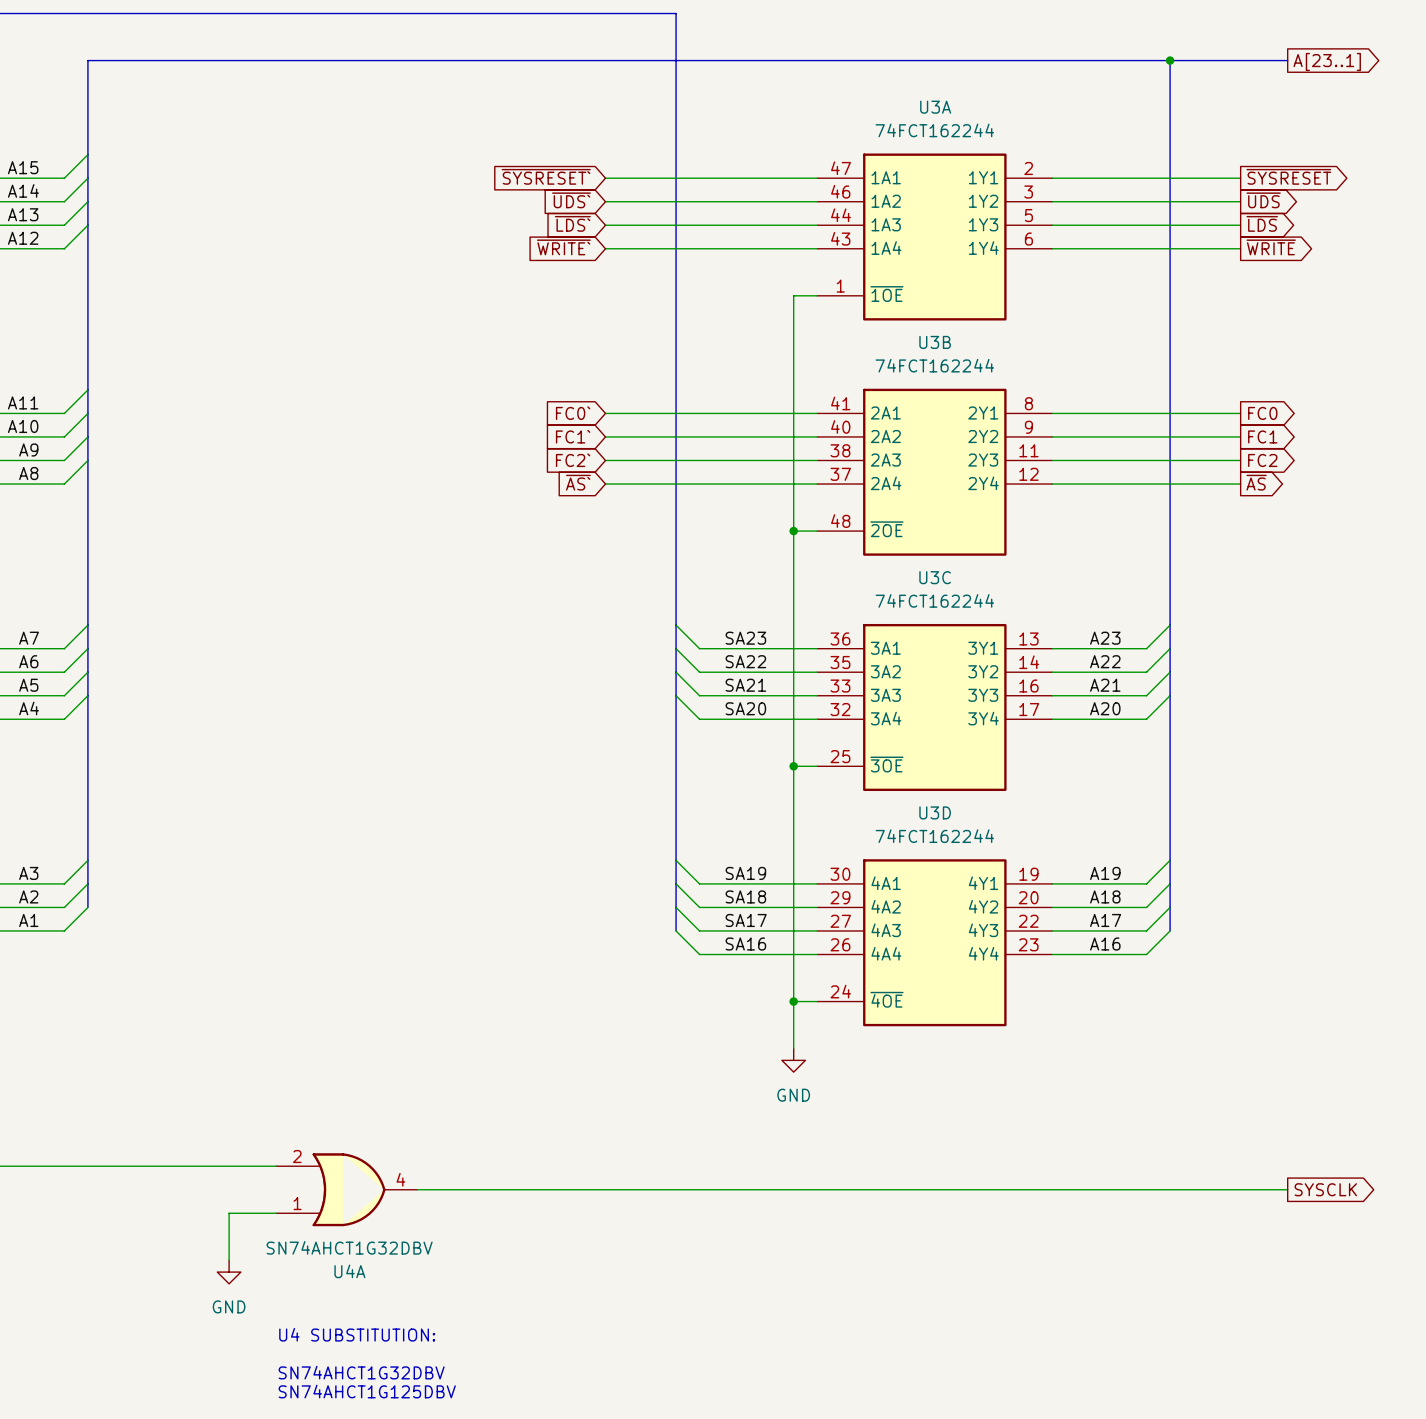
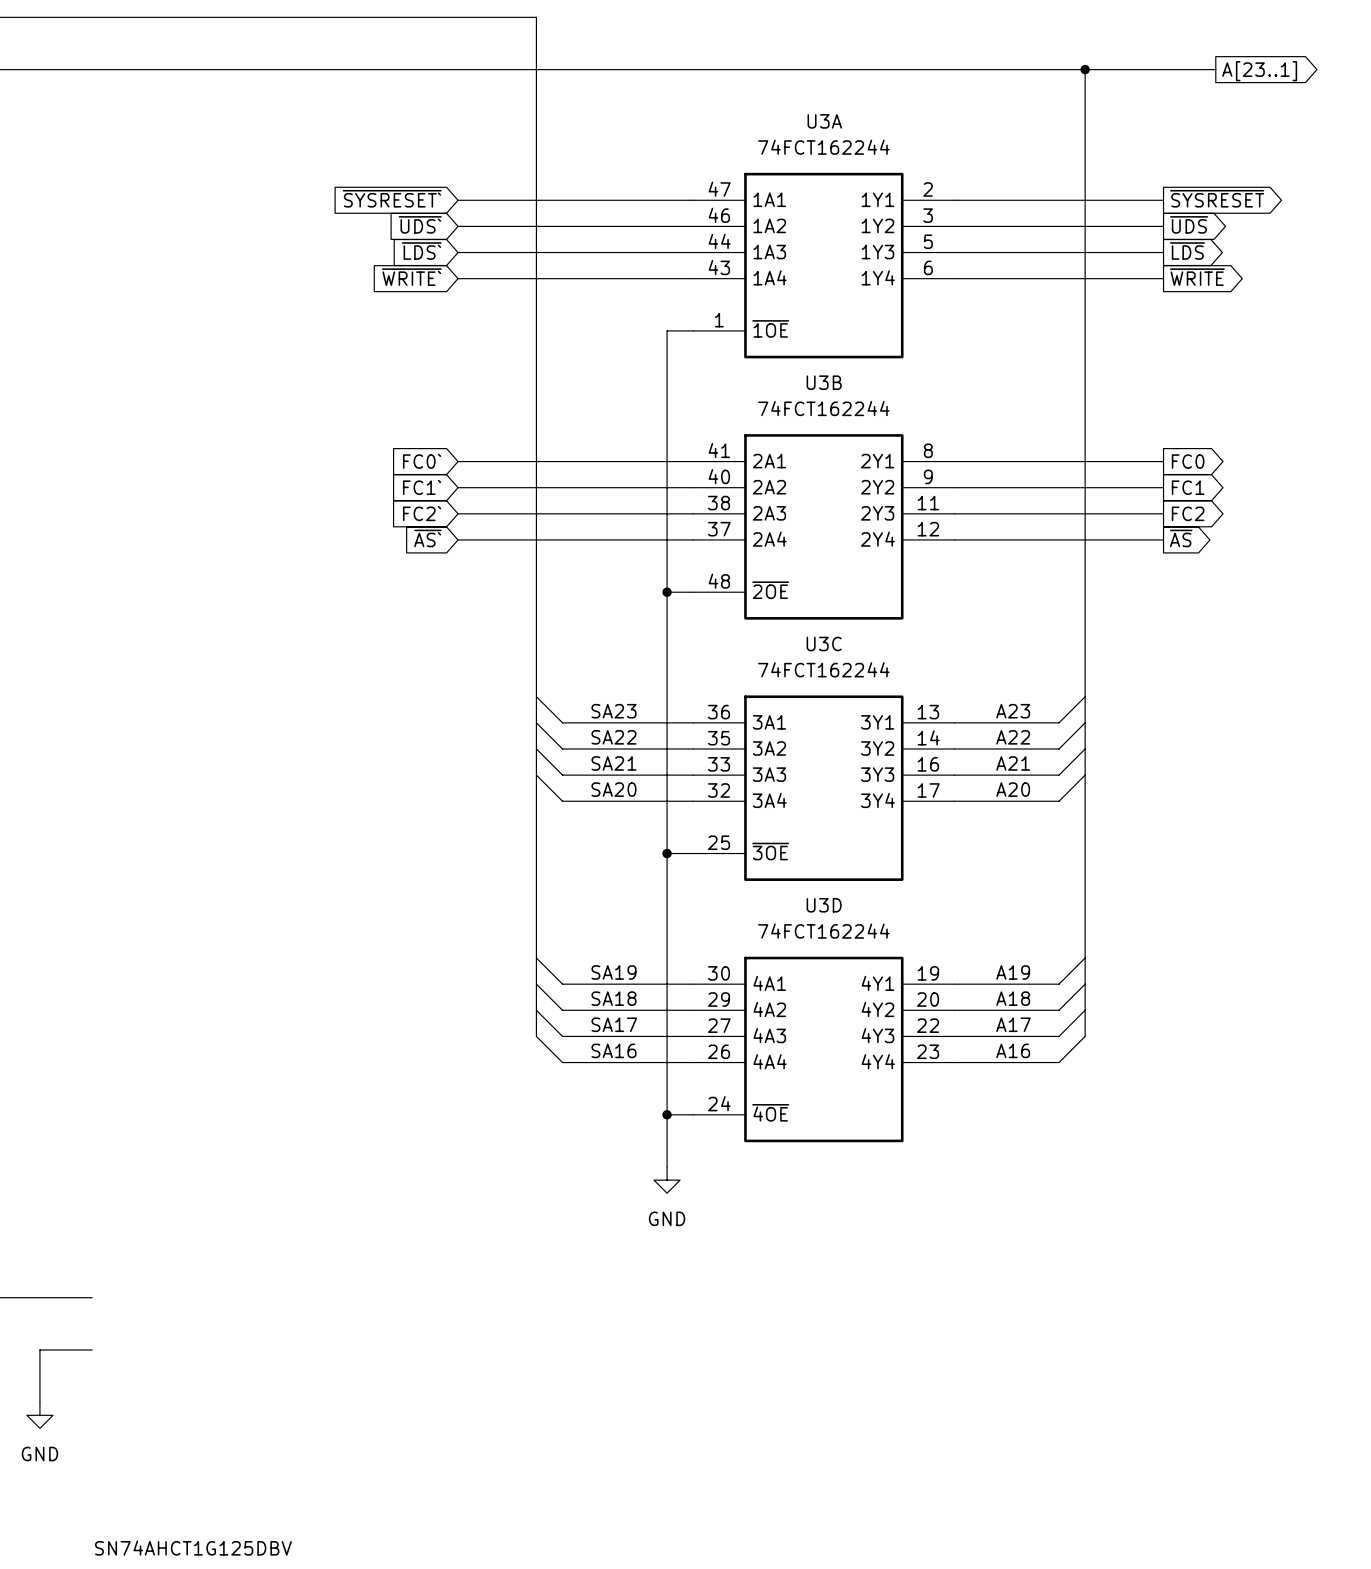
U4A: SN74AHCT1G32DBV (346, 1189) -> none
wire: (417, 1189) (1287, 1189) -> none
global label: SYSCLK (1325, 1189) -> none
text: U4 SUBSTITUTION: (357, 1334) -> none
text: SN74AHCT1G32DBV (361, 1372) -> none

